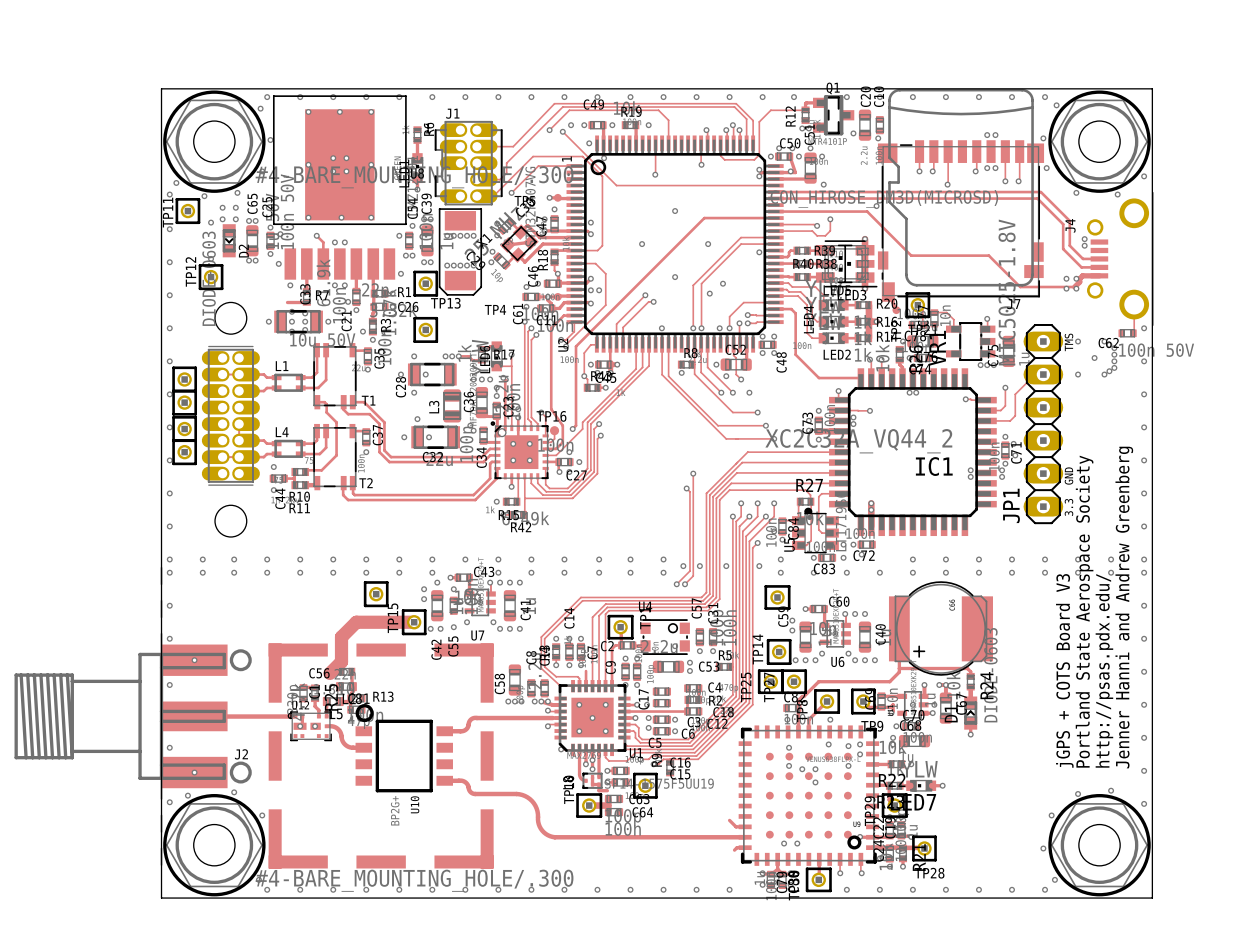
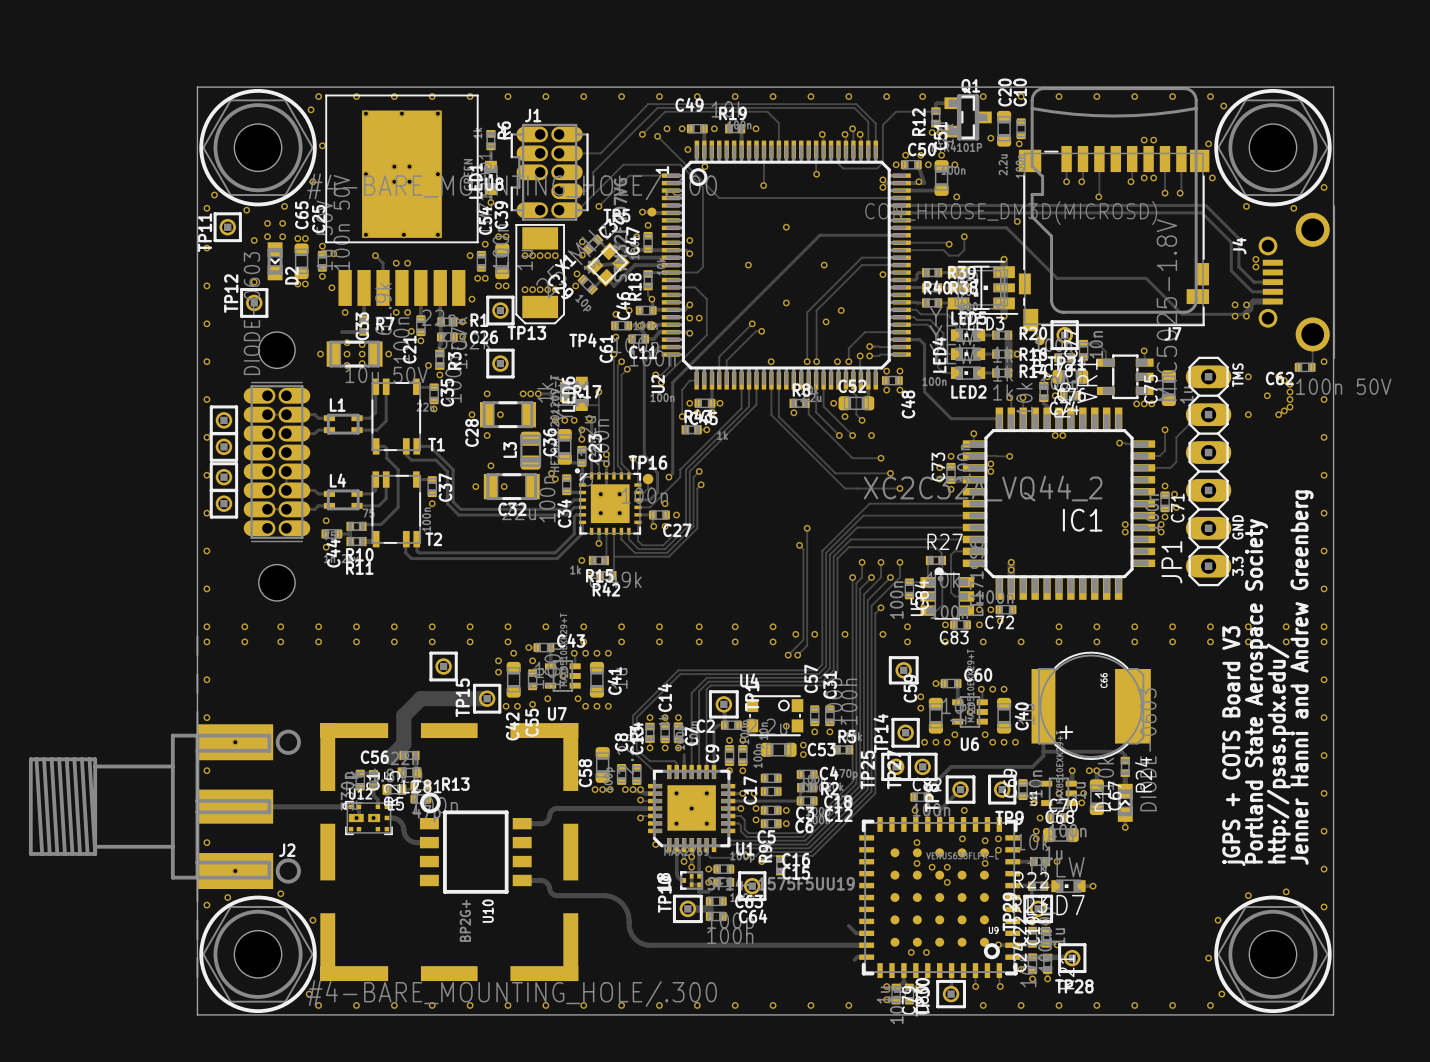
via: (774, 531) -> none
via: (782, 539) -> none

